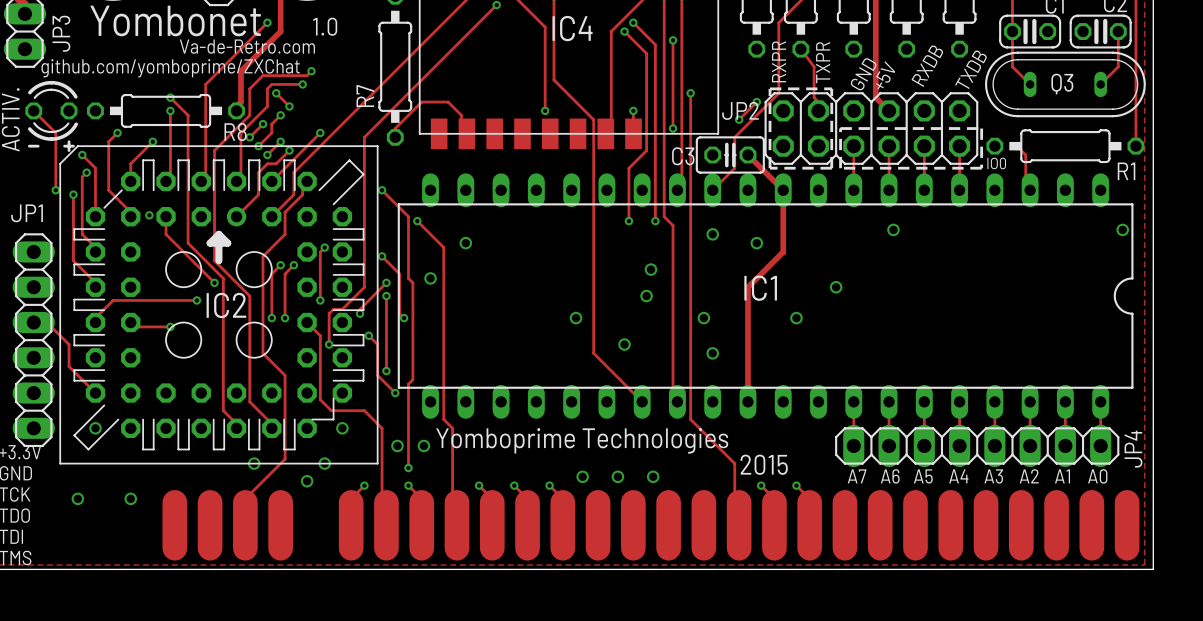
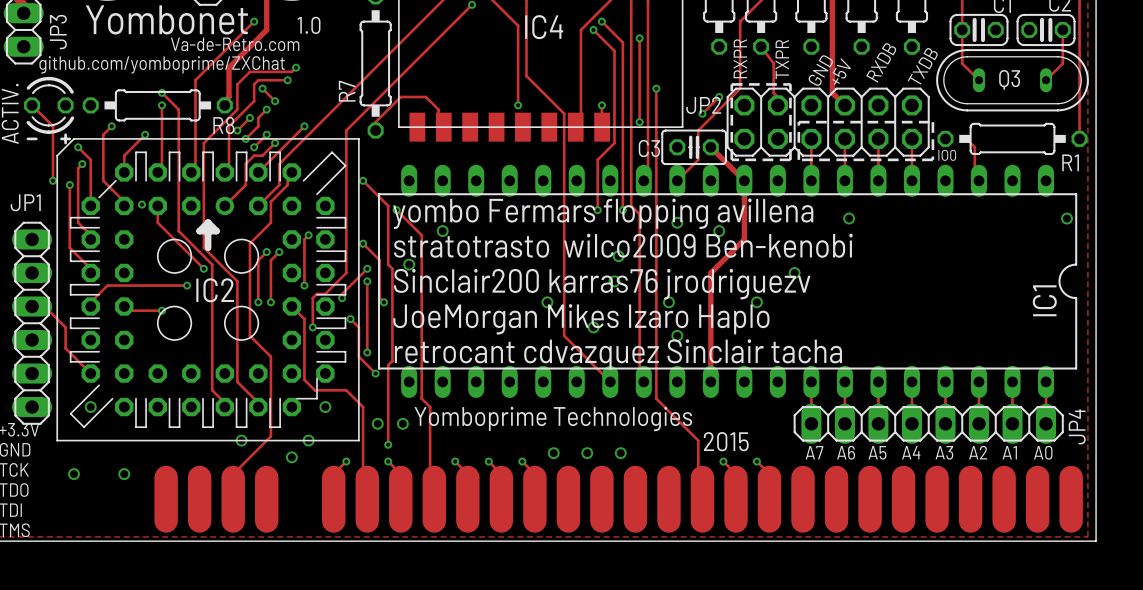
text: none -> yombo Fermars flopping avillena (603, 213)
text: none -> stratotrasto wilco2009 Ben-kenobi (623, 245)
IC1 name rotation: 0° (760, 288) -> 90° counterclockwise (1044, 300)
IC1 name position: IC1 (760, 288) -> IC1 (1044, 300)
text: none -> Sinclair200 karras76 jrodriguezv (602, 284)
text: none -> JoeMorgan Mikes Izaro Haplo (581, 319)
text: none -> retrocant cdvazquez Sinclair tacha (618, 354)

